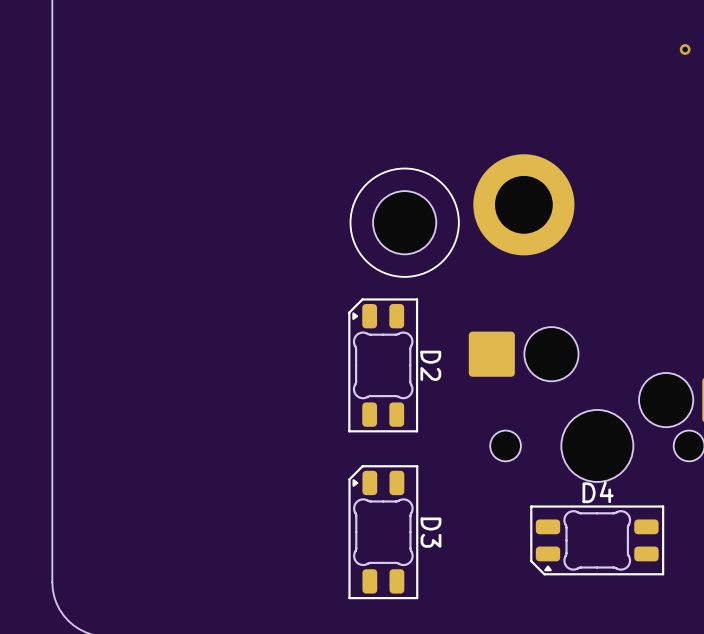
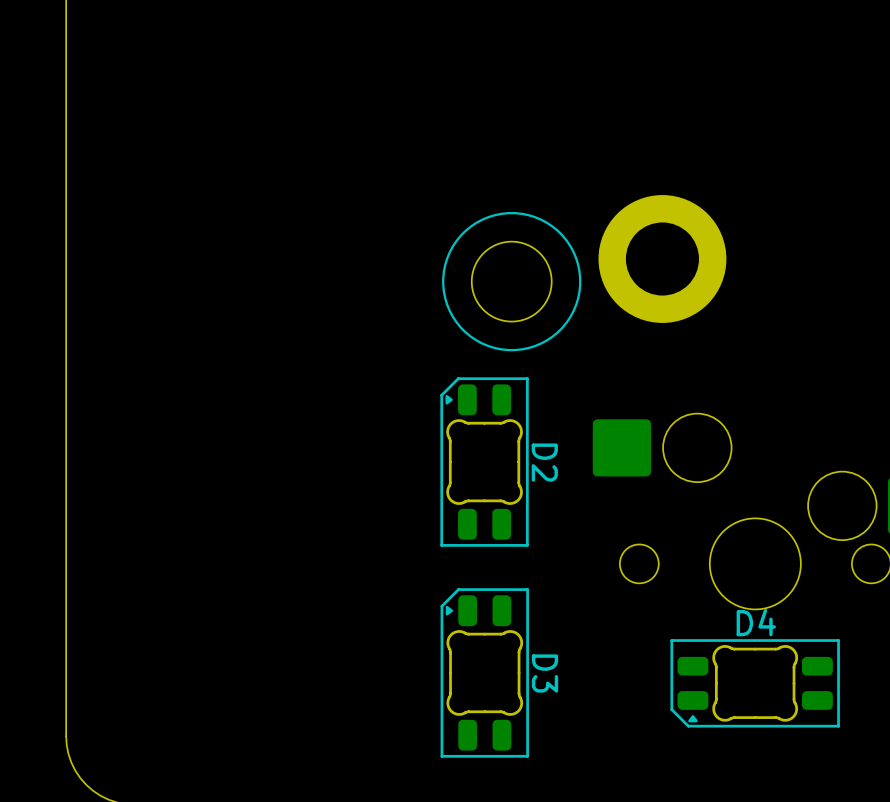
via: (685, 49) -> none

